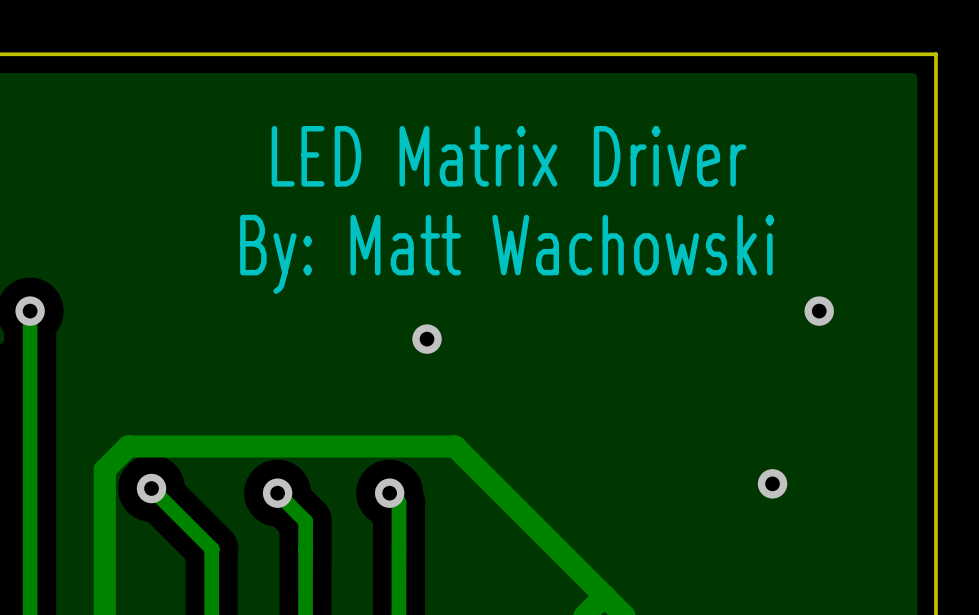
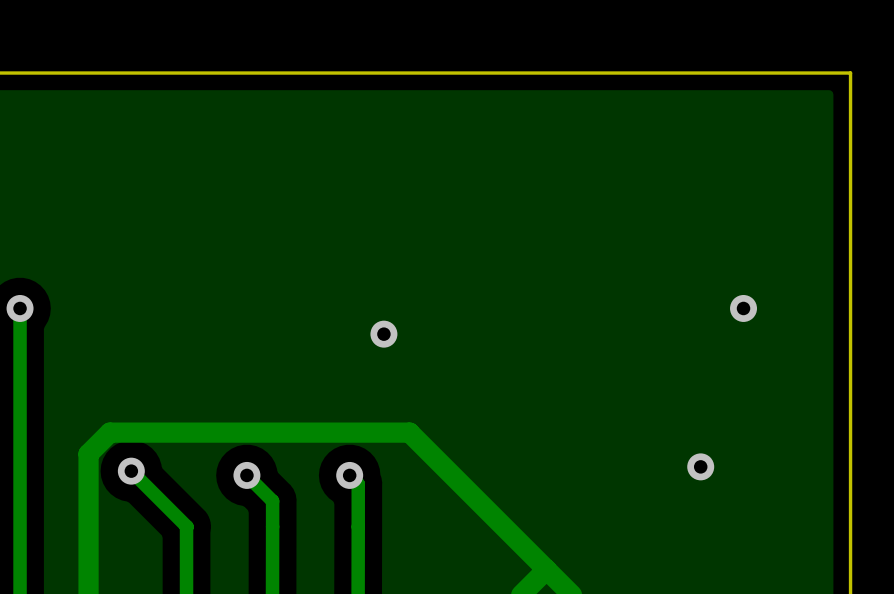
text: LED Matrix Driver (509, 156) -> none
text: By: Matt Wachowski (507, 254) -> none

